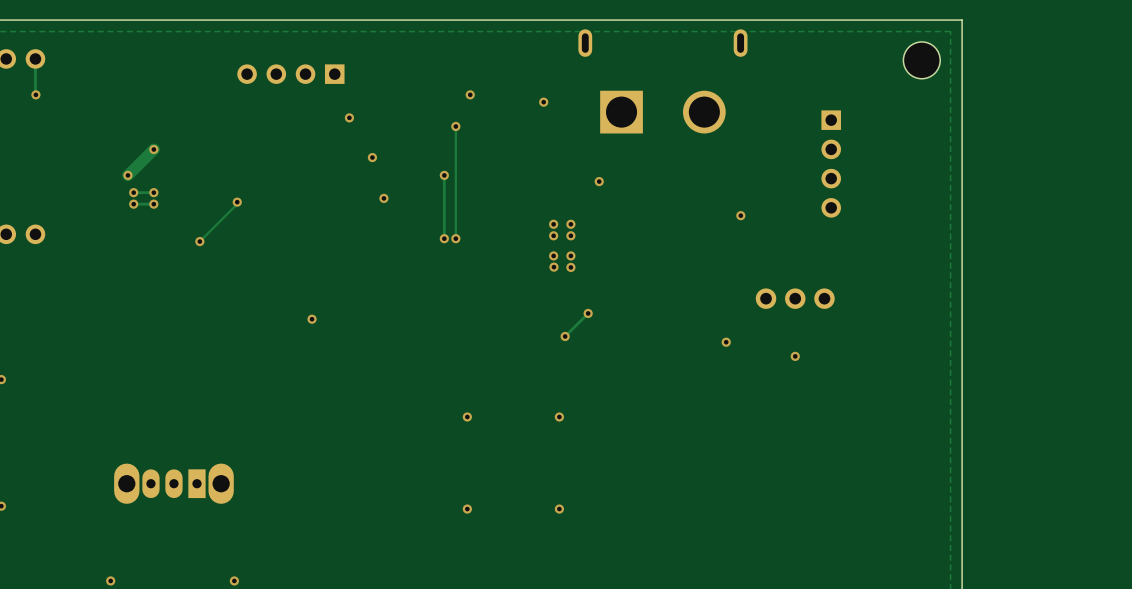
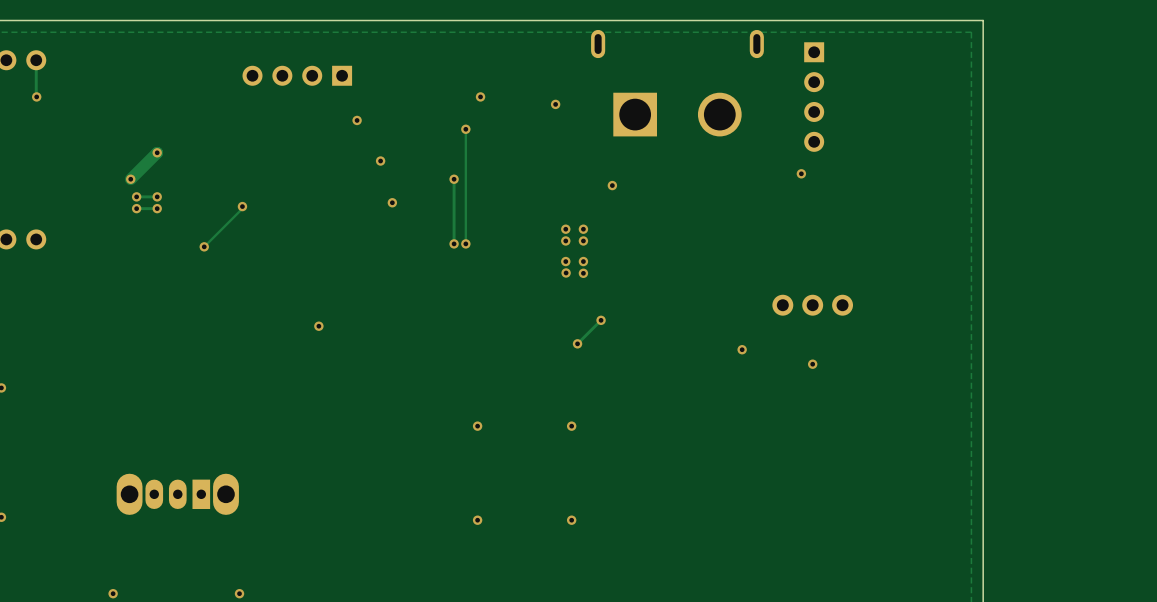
part: (921, 60) -> none
part position: (831, 164) -> (814, 97)
via position: (740, 215) -> (801, 173)

